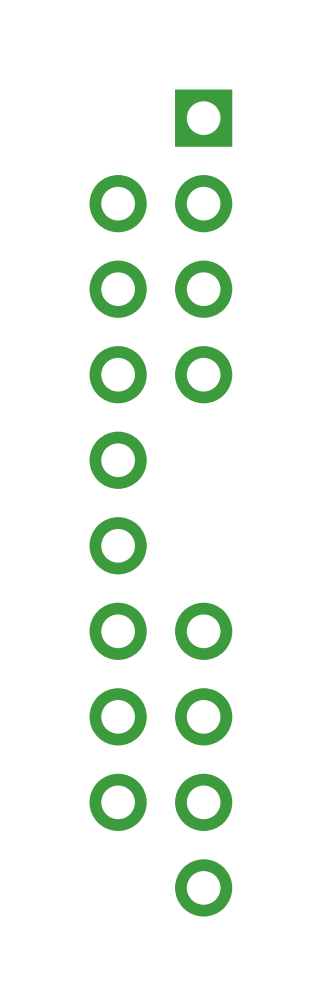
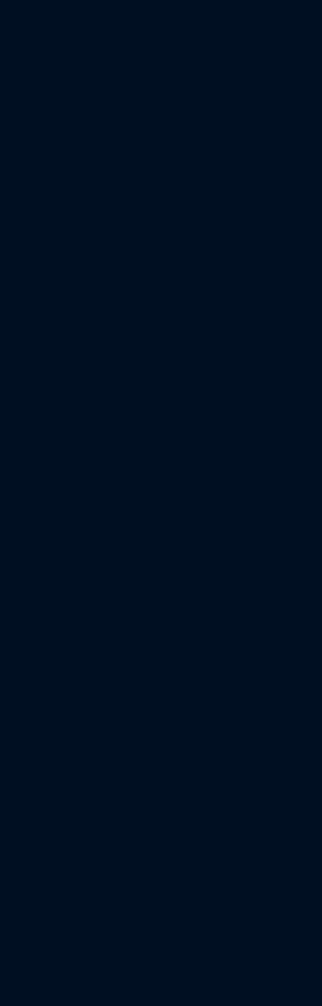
part: (160, 503) -> none

